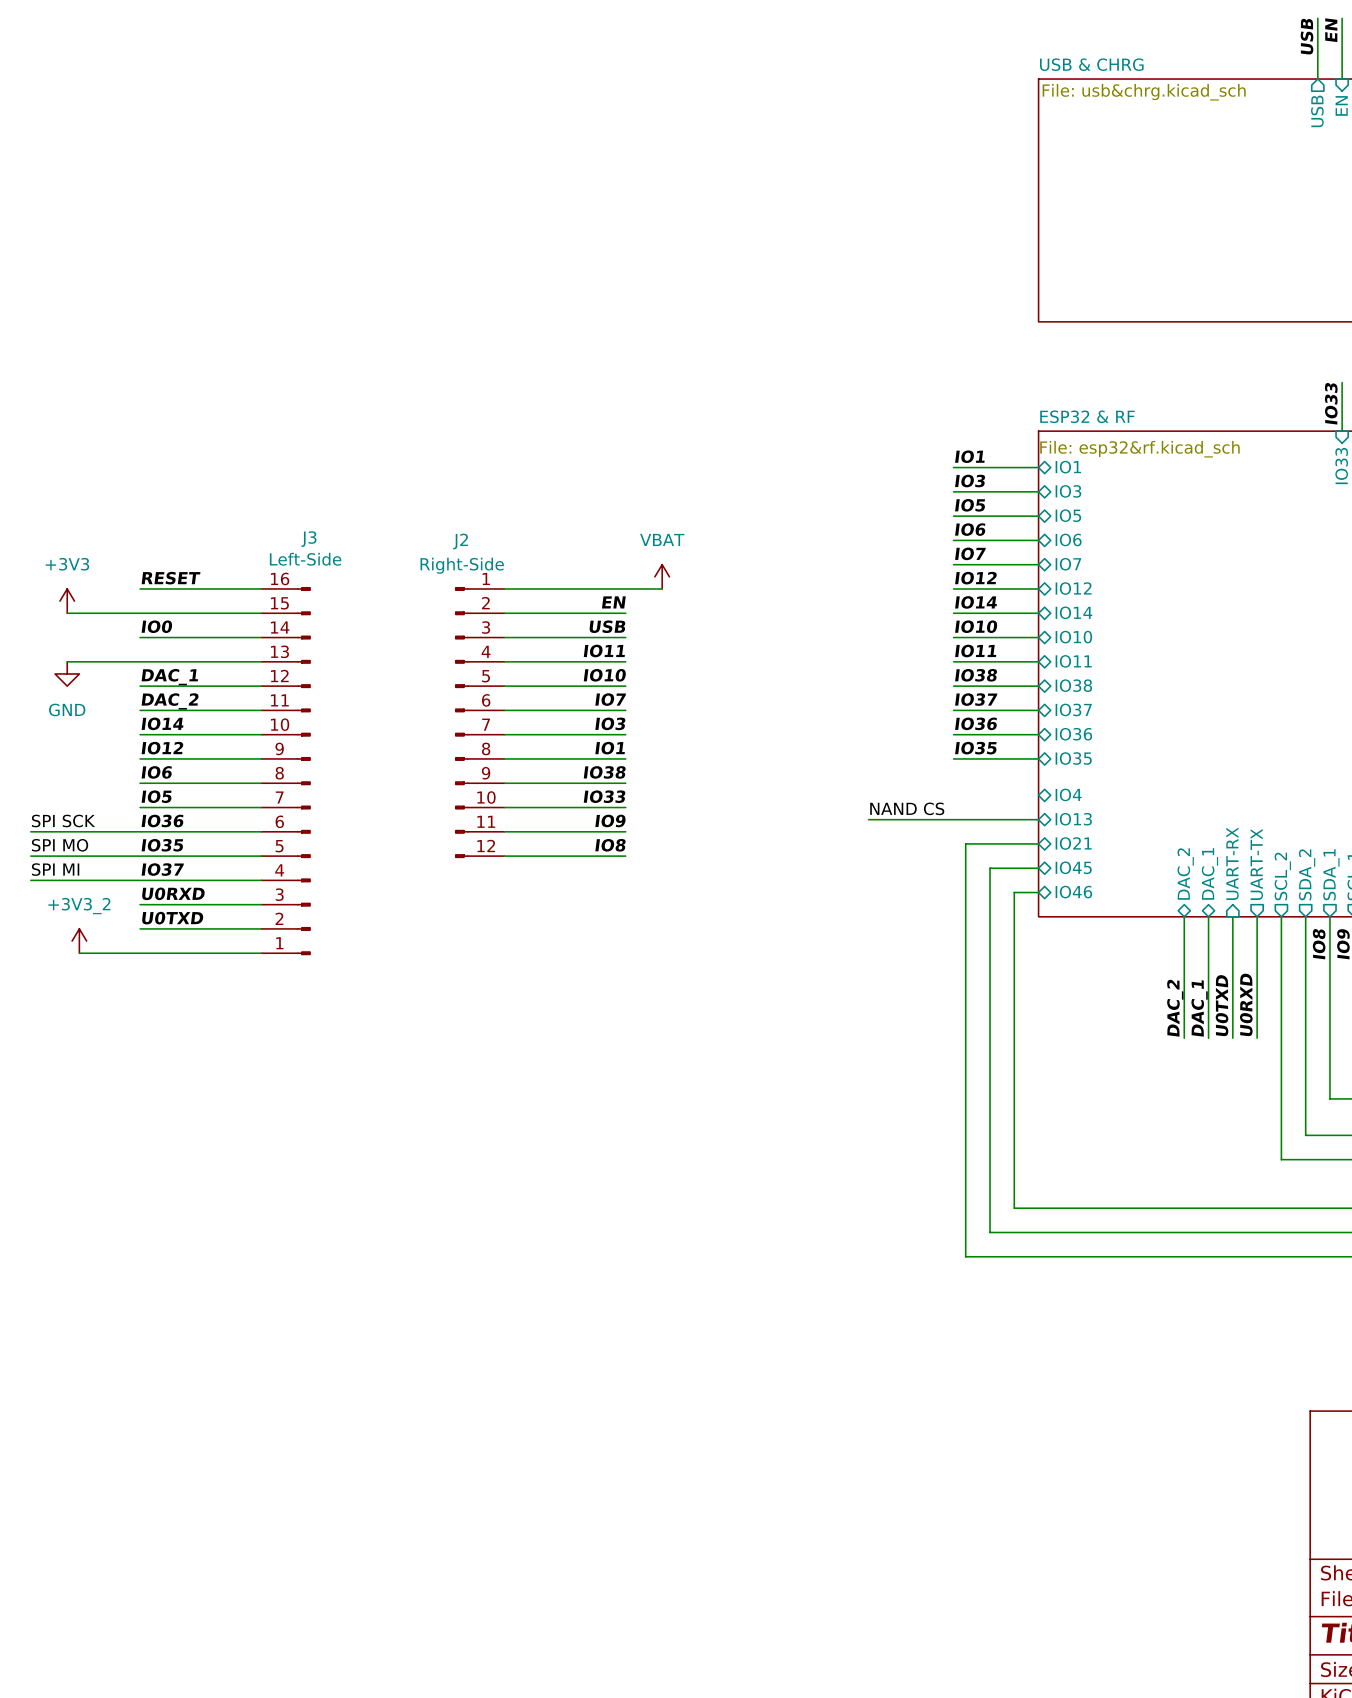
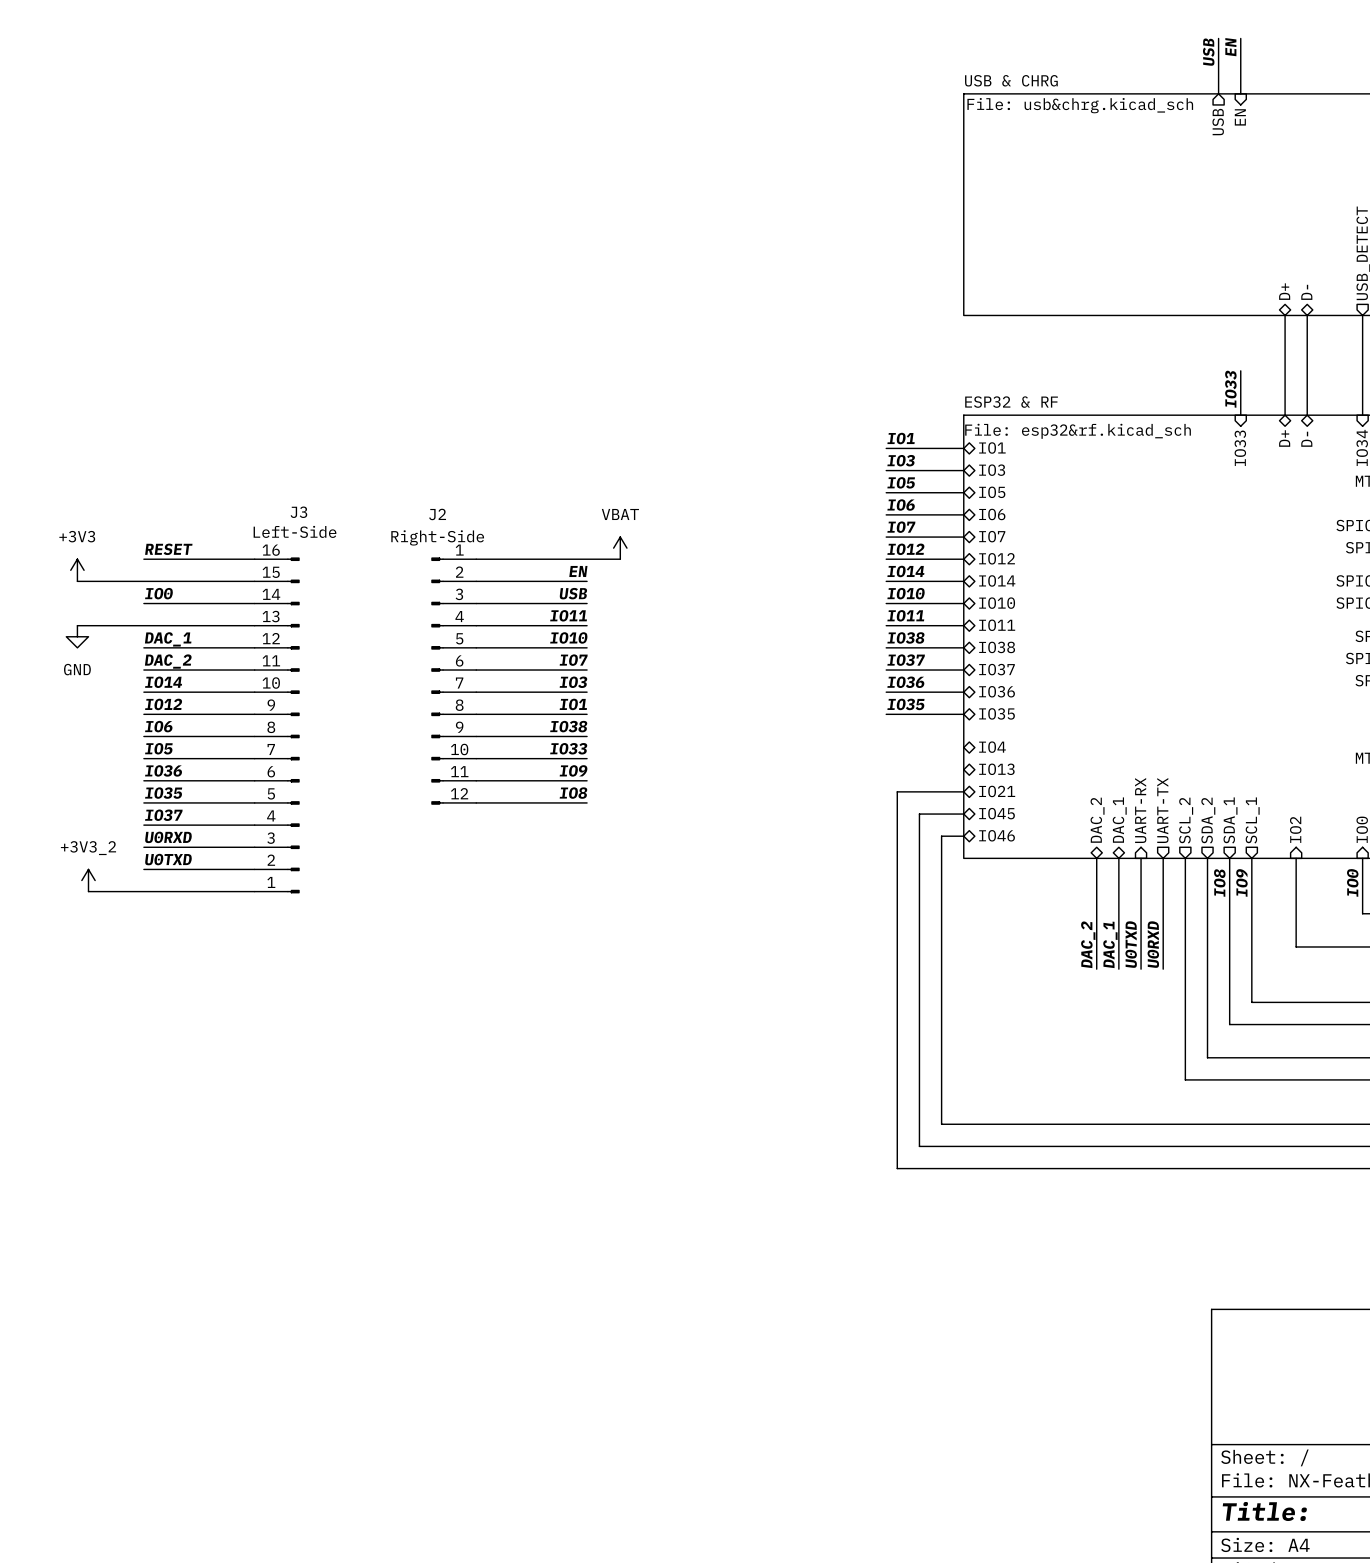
label: NAND CS (907, 808) -> none
wire: (868, 819) (1038, 819) -> none
label: SPI SCK (63, 820) -> none
wire: (30, 831) (140, 831) -> none
label: SPI MO (60, 845) -> none
wire: (30, 856) (140, 856) -> none
label: SPI MI (55, 869) -> none
wire: (30, 880) (140, 880) -> none

